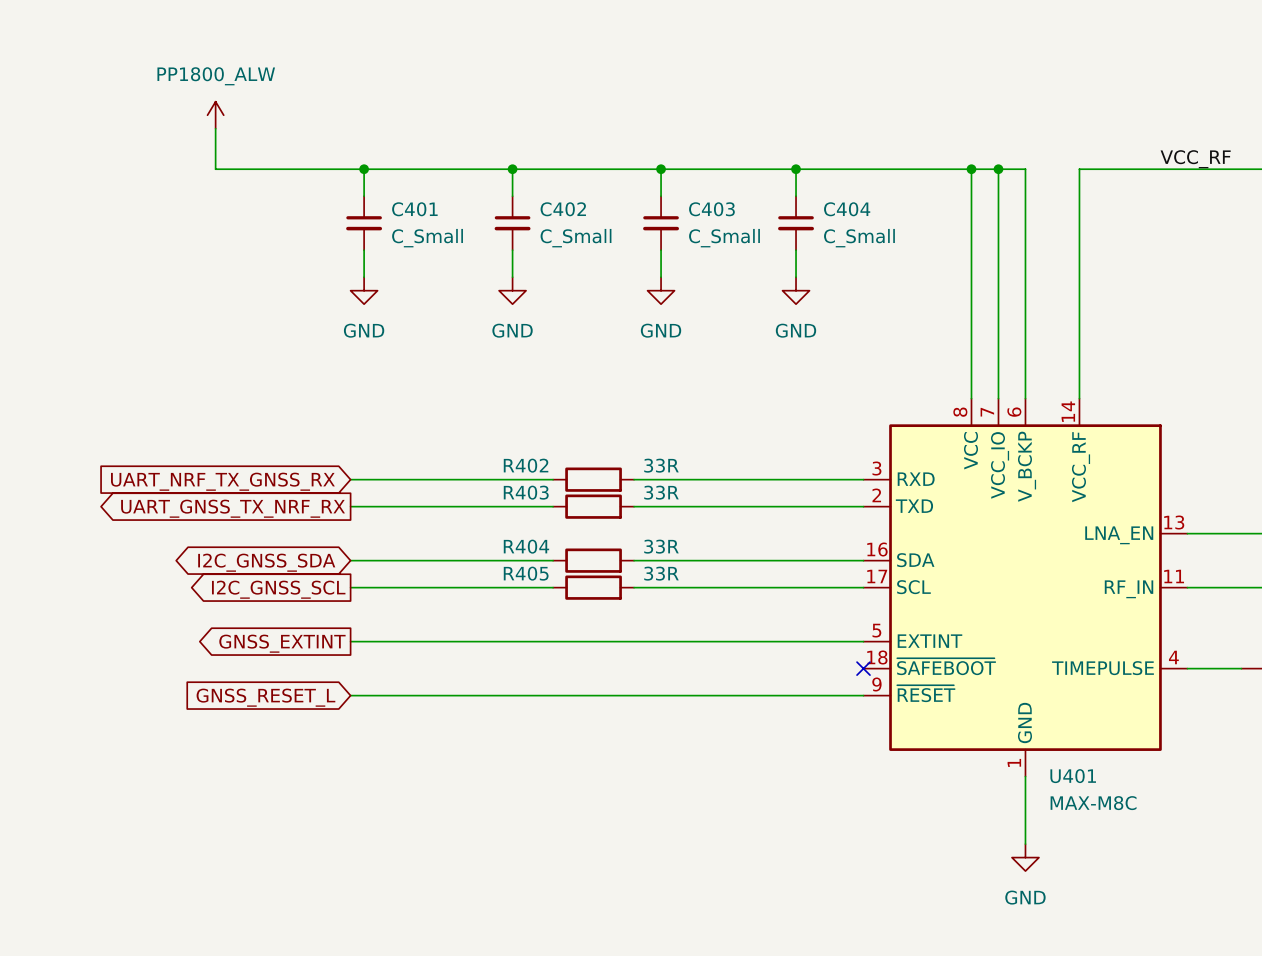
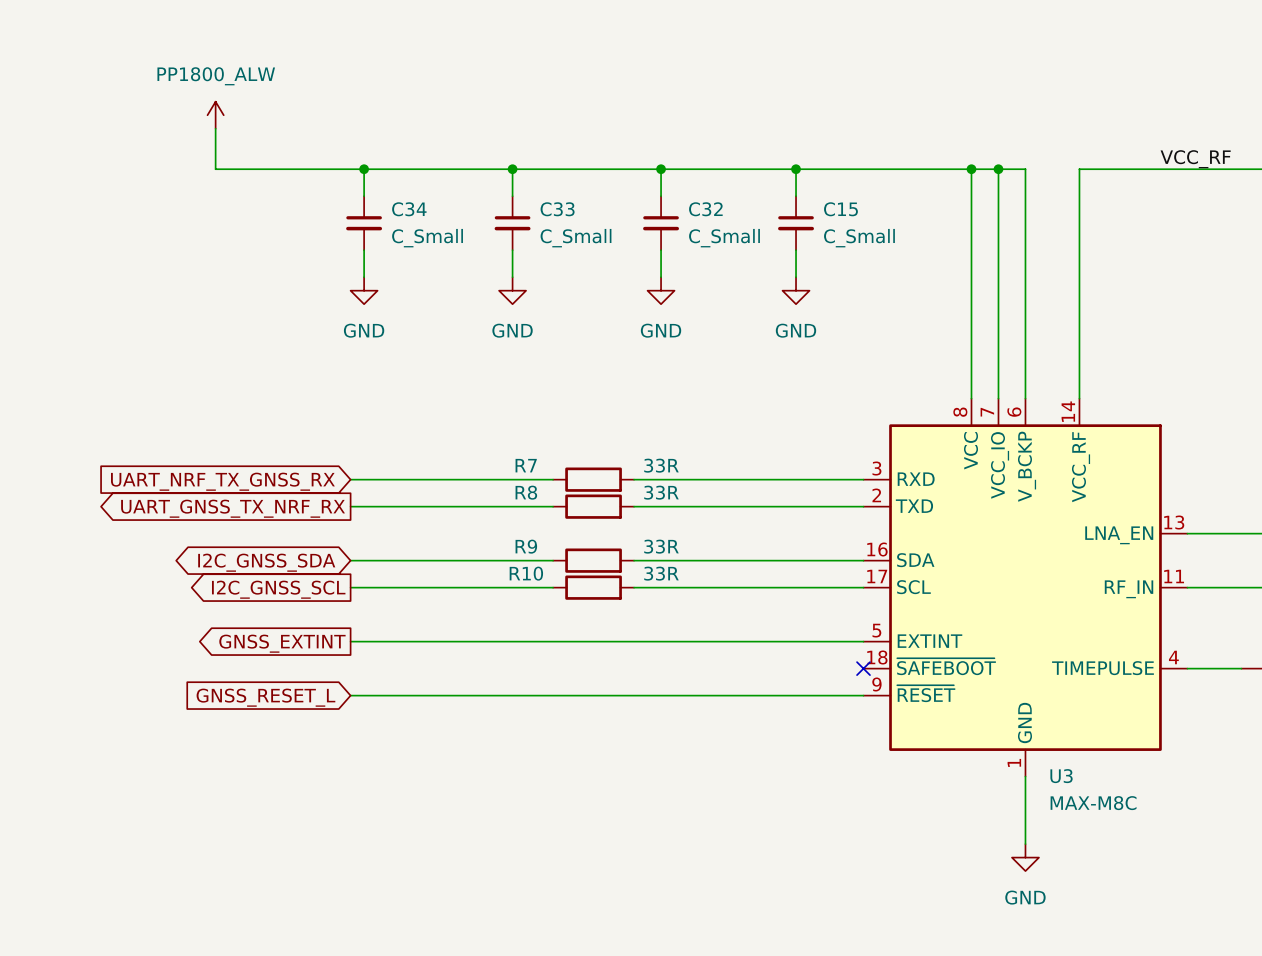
C401 name: C401 (414, 209) -> C34 (409, 209)
C402 name: C402 (563, 209) -> C33 (557, 209)
C403 name: C403 (711, 209) -> C32 (705, 209)
C404 name: C404 (847, 209) -> C15 (840, 209)
R402 name: R402 (526, 465) -> R7 (526, 465)
R403 name: R403 (526, 492) -> R8 (526, 492)
R404 name: R404 (526, 546) -> R9 (526, 546)
R405 name: R405 (526, 573) -> R10 (526, 573)
U401 name: U401 (1073, 776) -> U3 (1061, 776)

